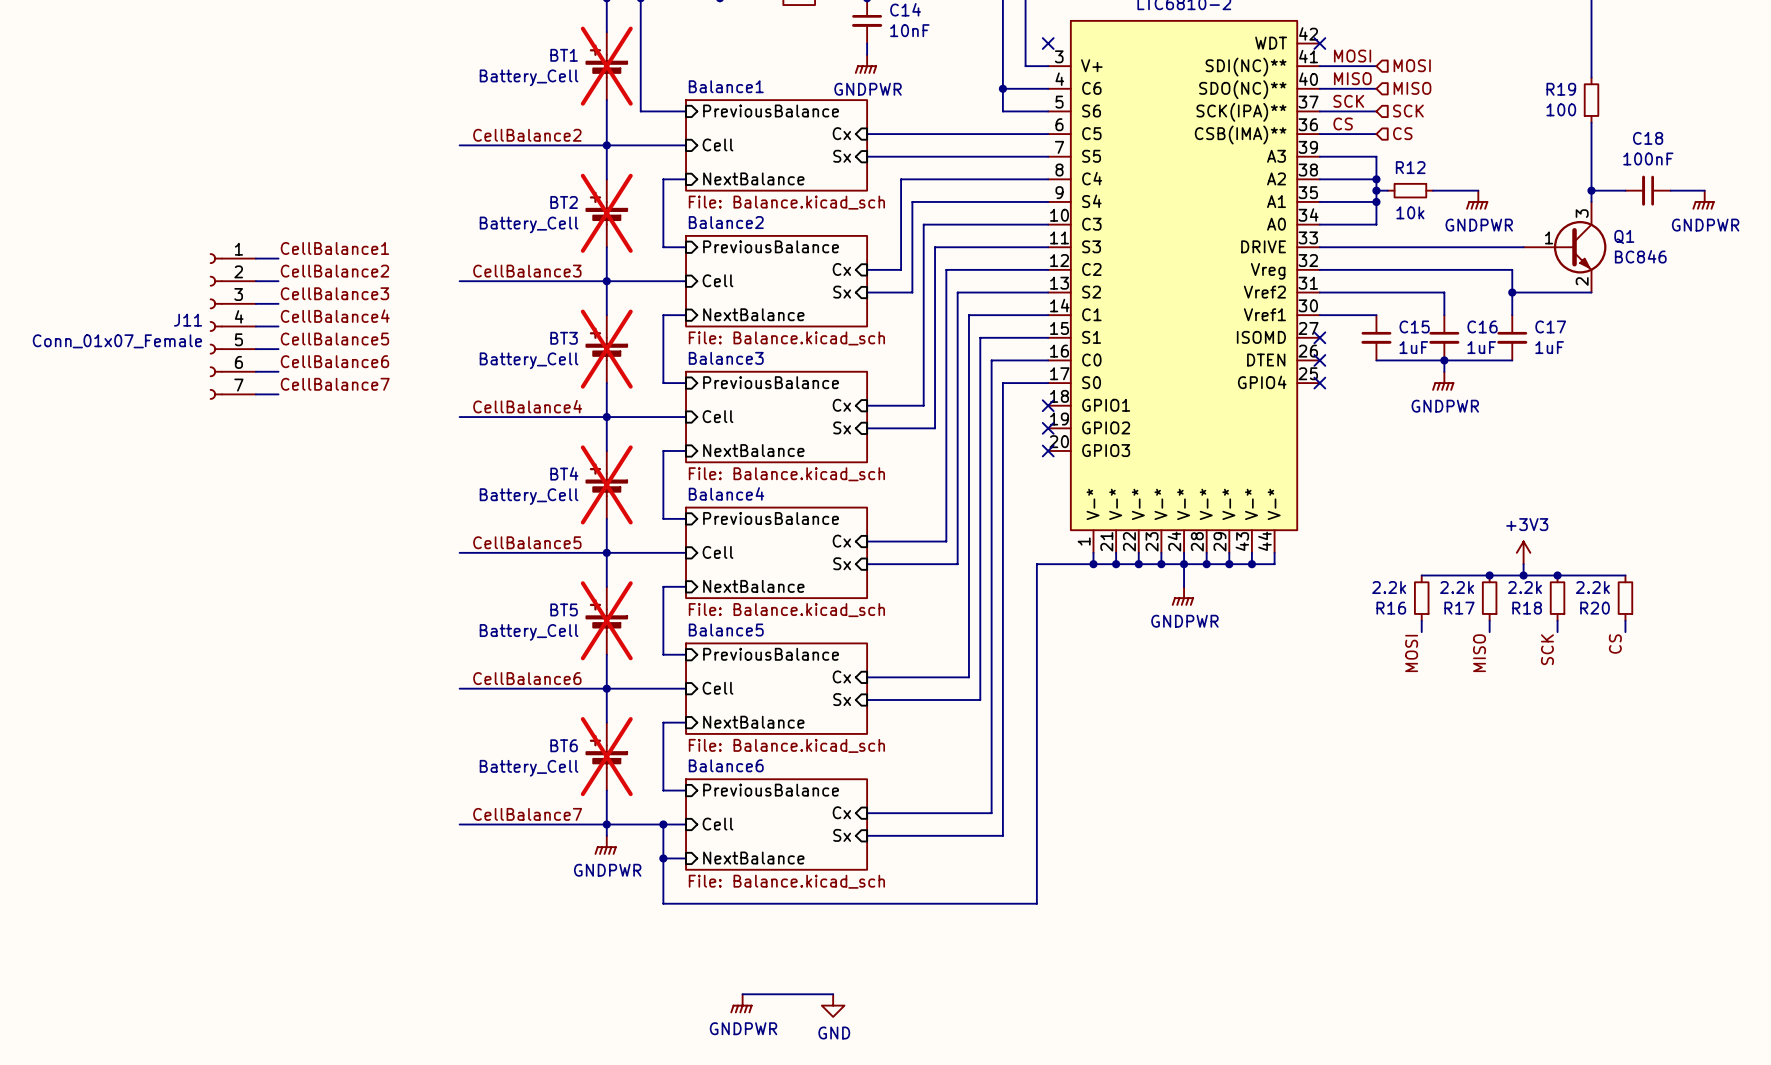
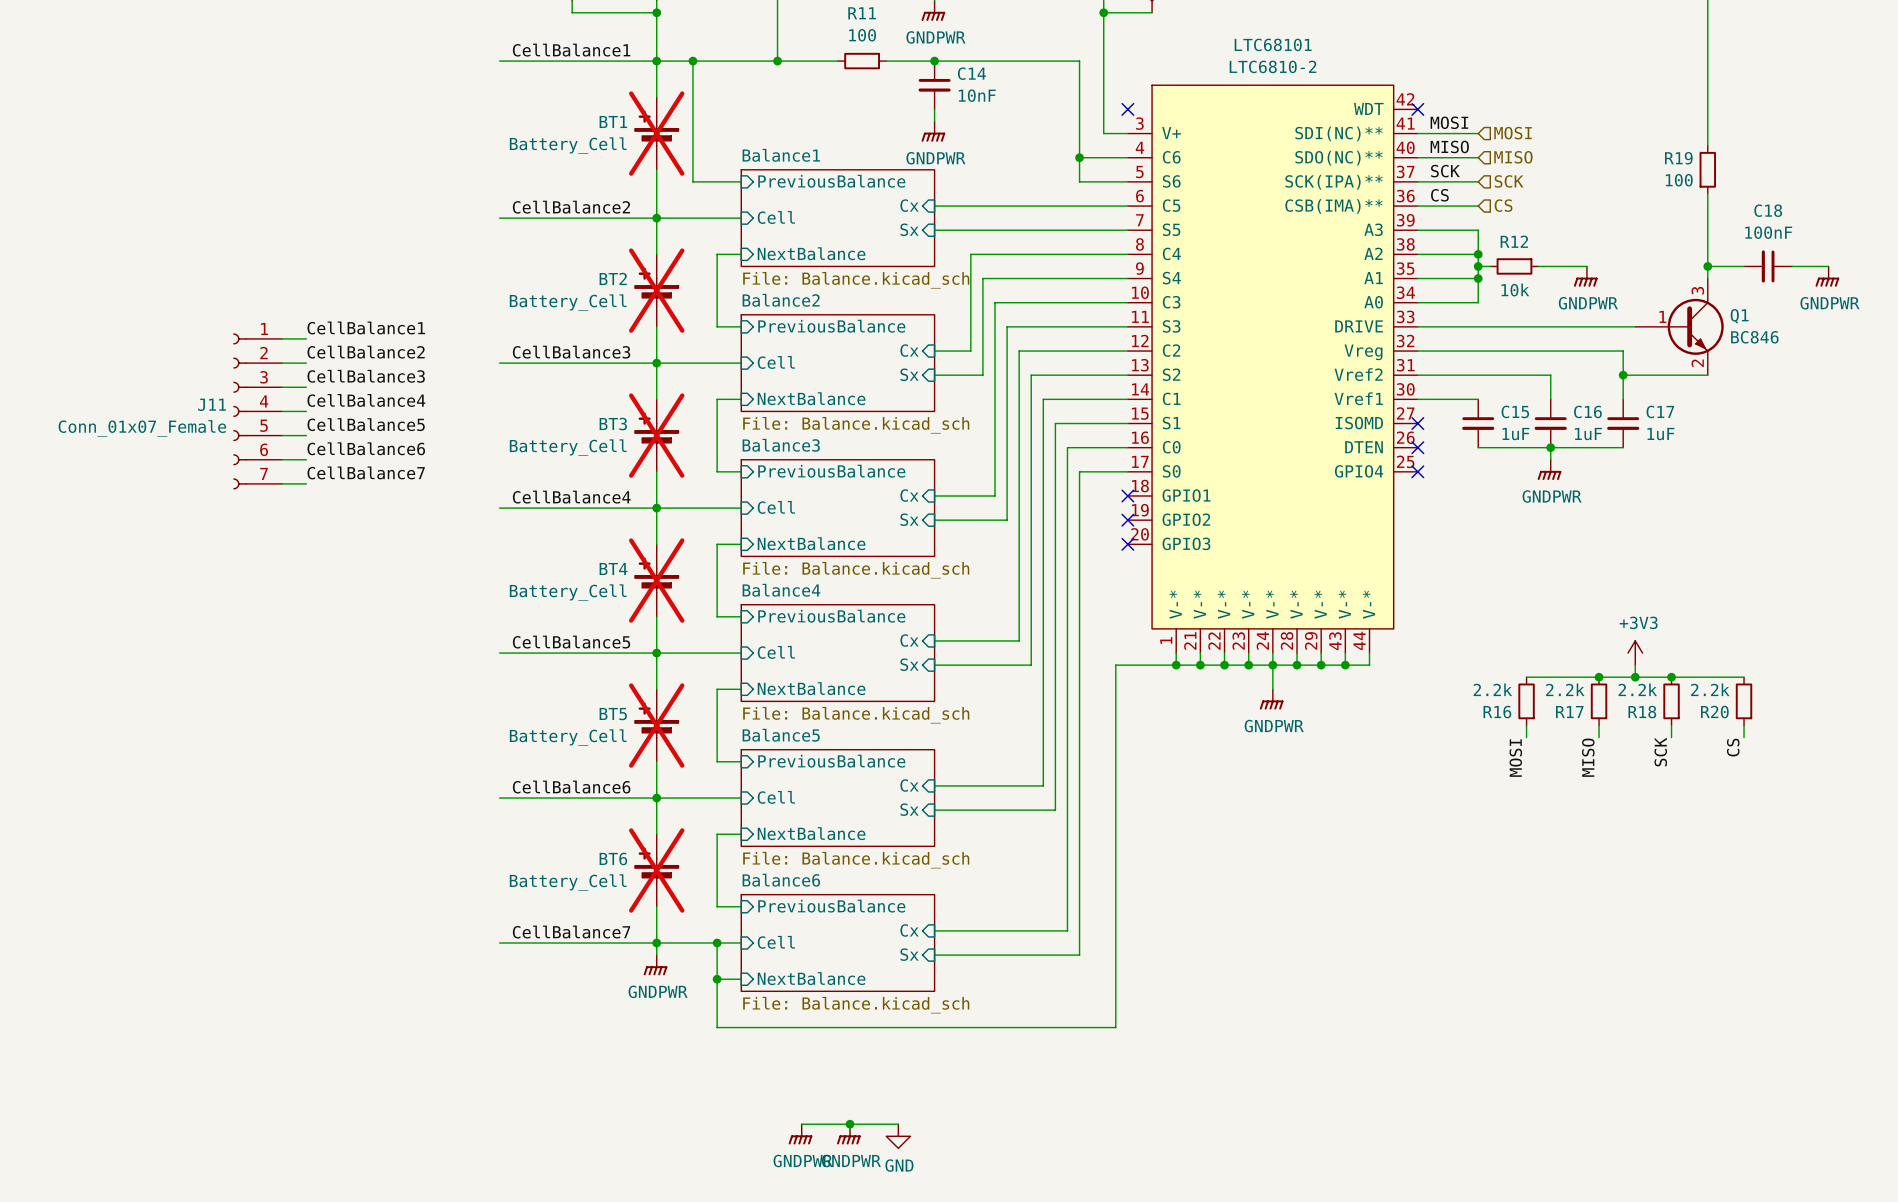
junction: none -> (850, 1124)
power symbol: none -> GNDPWR (848, 1134)

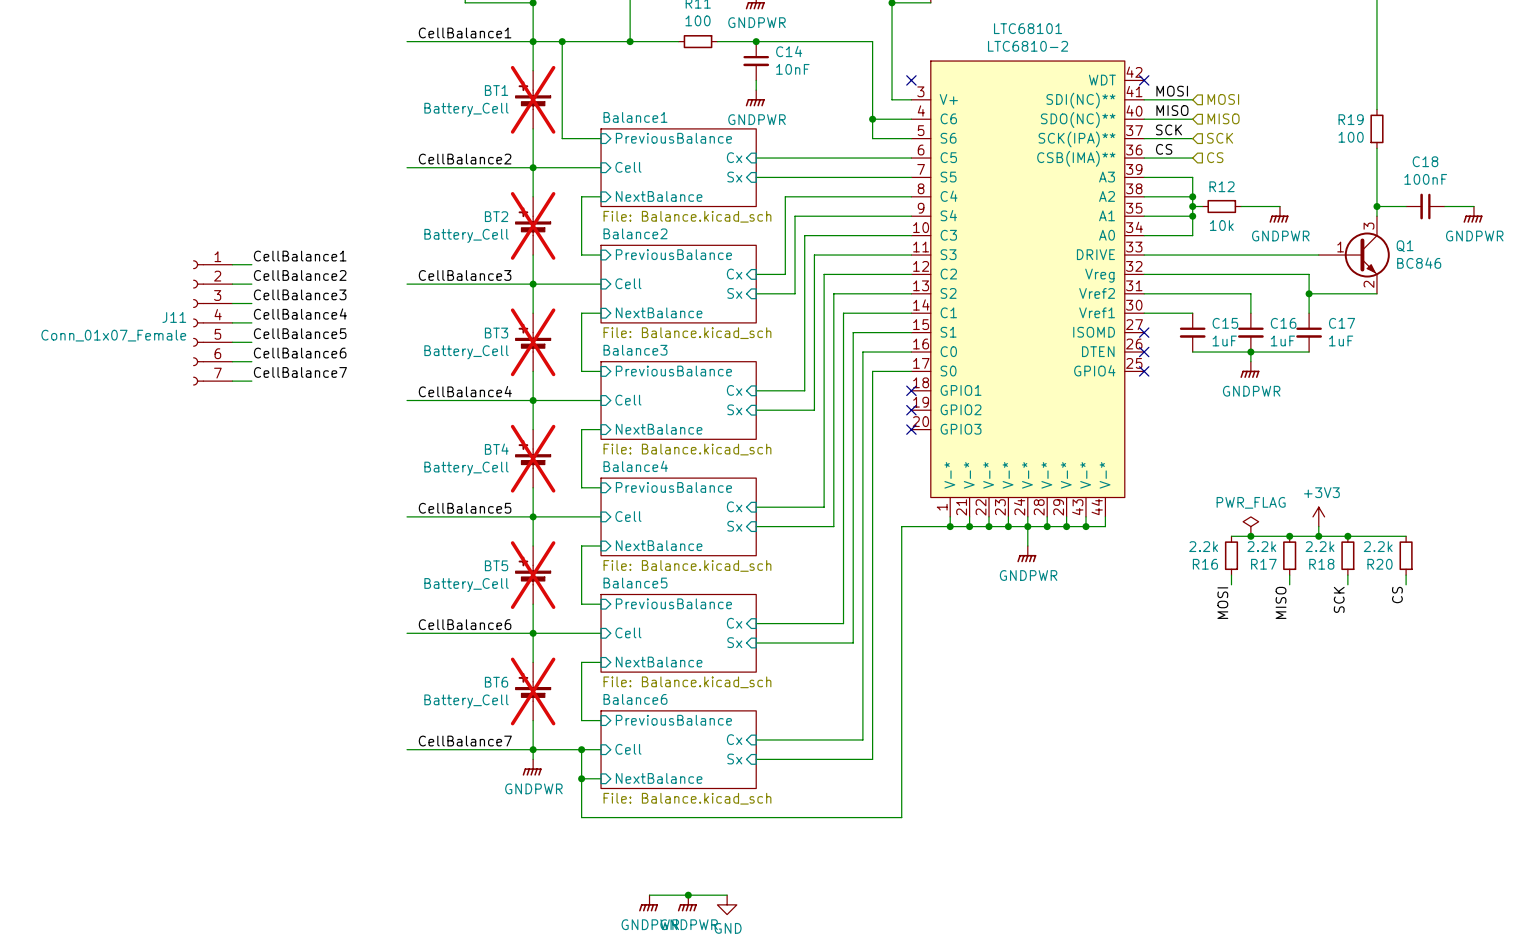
power symbol: none -> PWR_FLAG (1250, 526)
junction: none -> (1250, 536)

